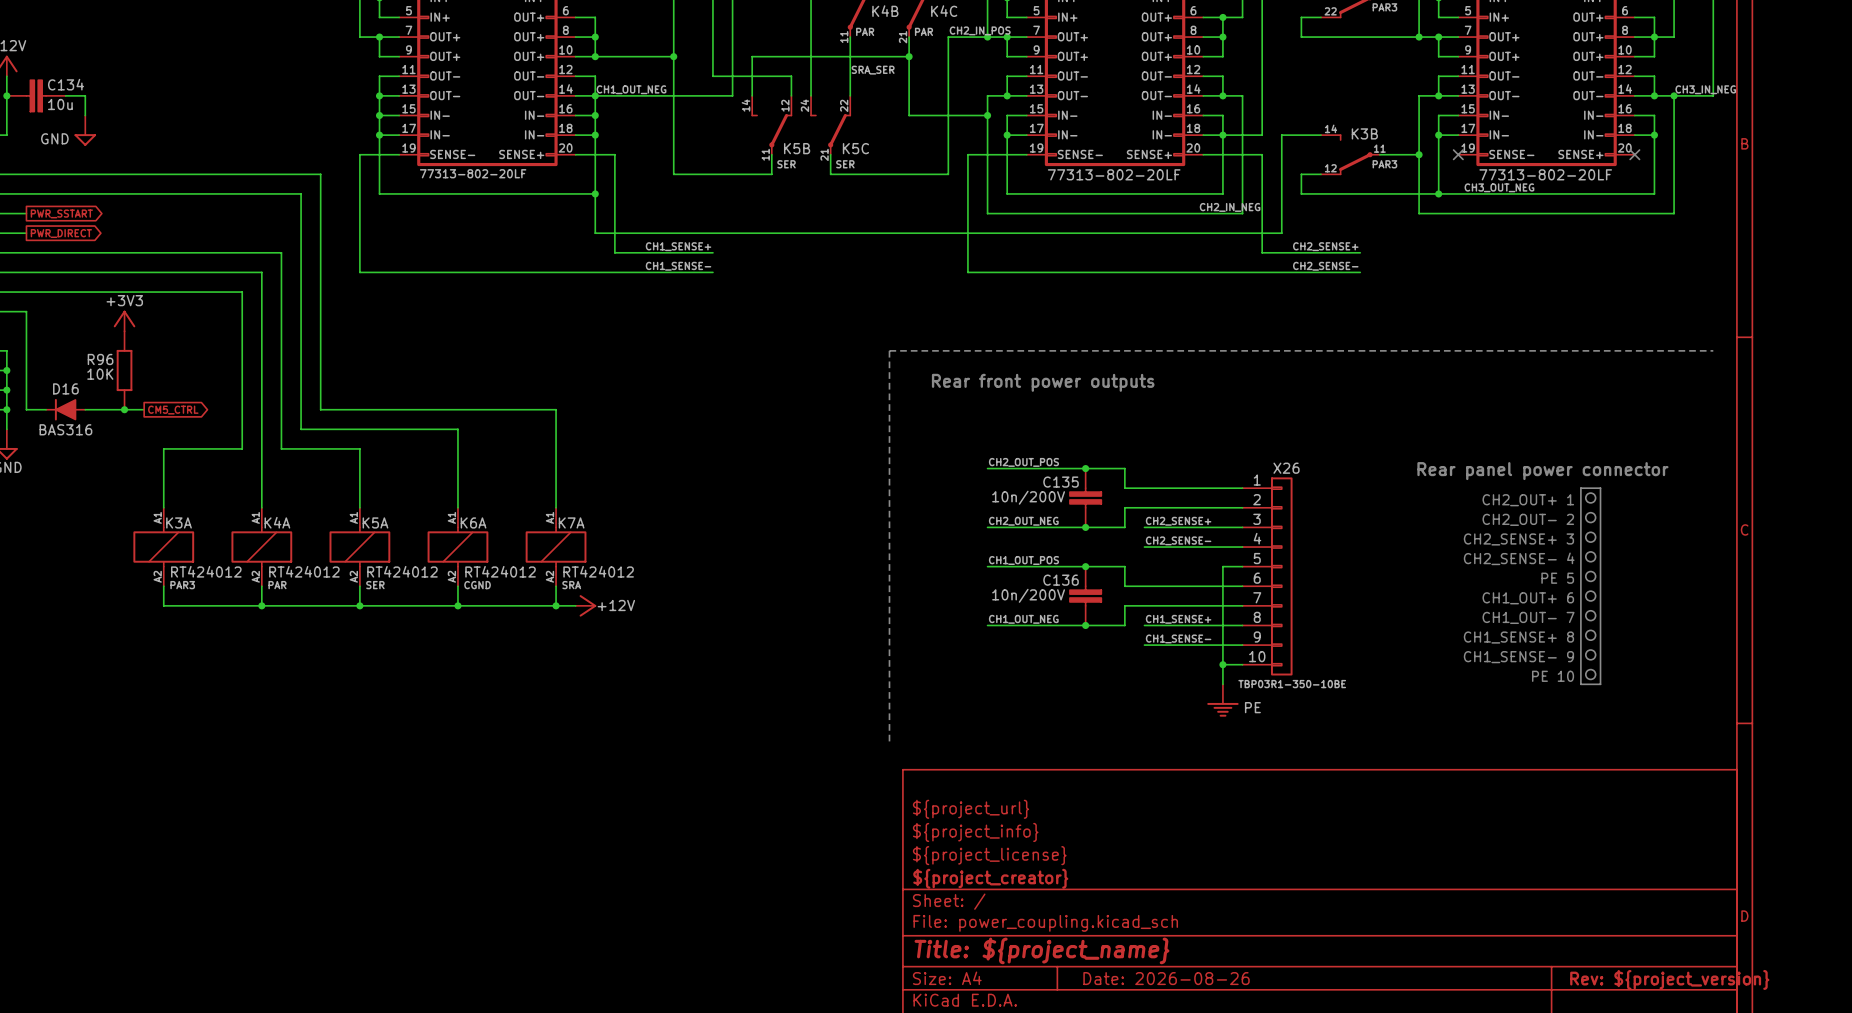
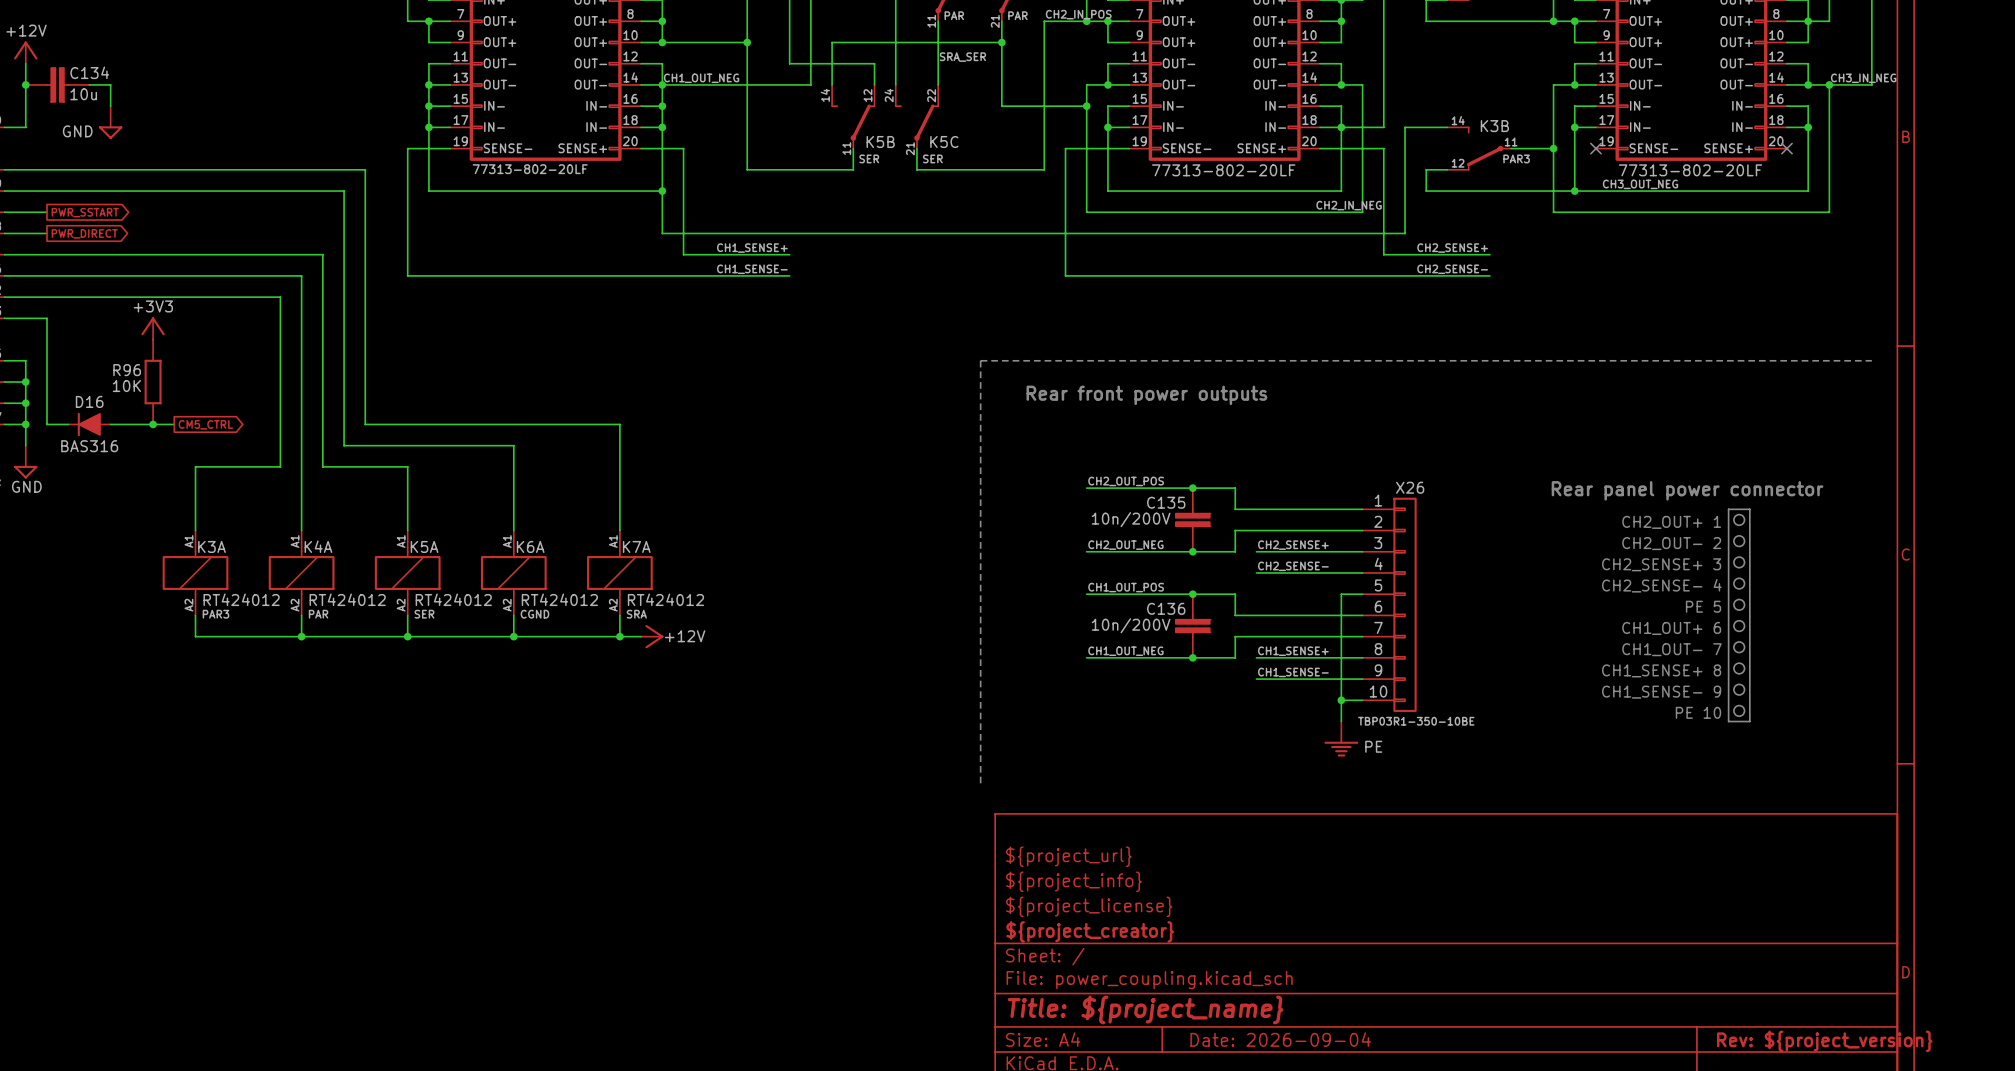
title block: Date: 2026-08-26 (1166, 978) -> Date: 2026-09-04 (1280, 1039)

